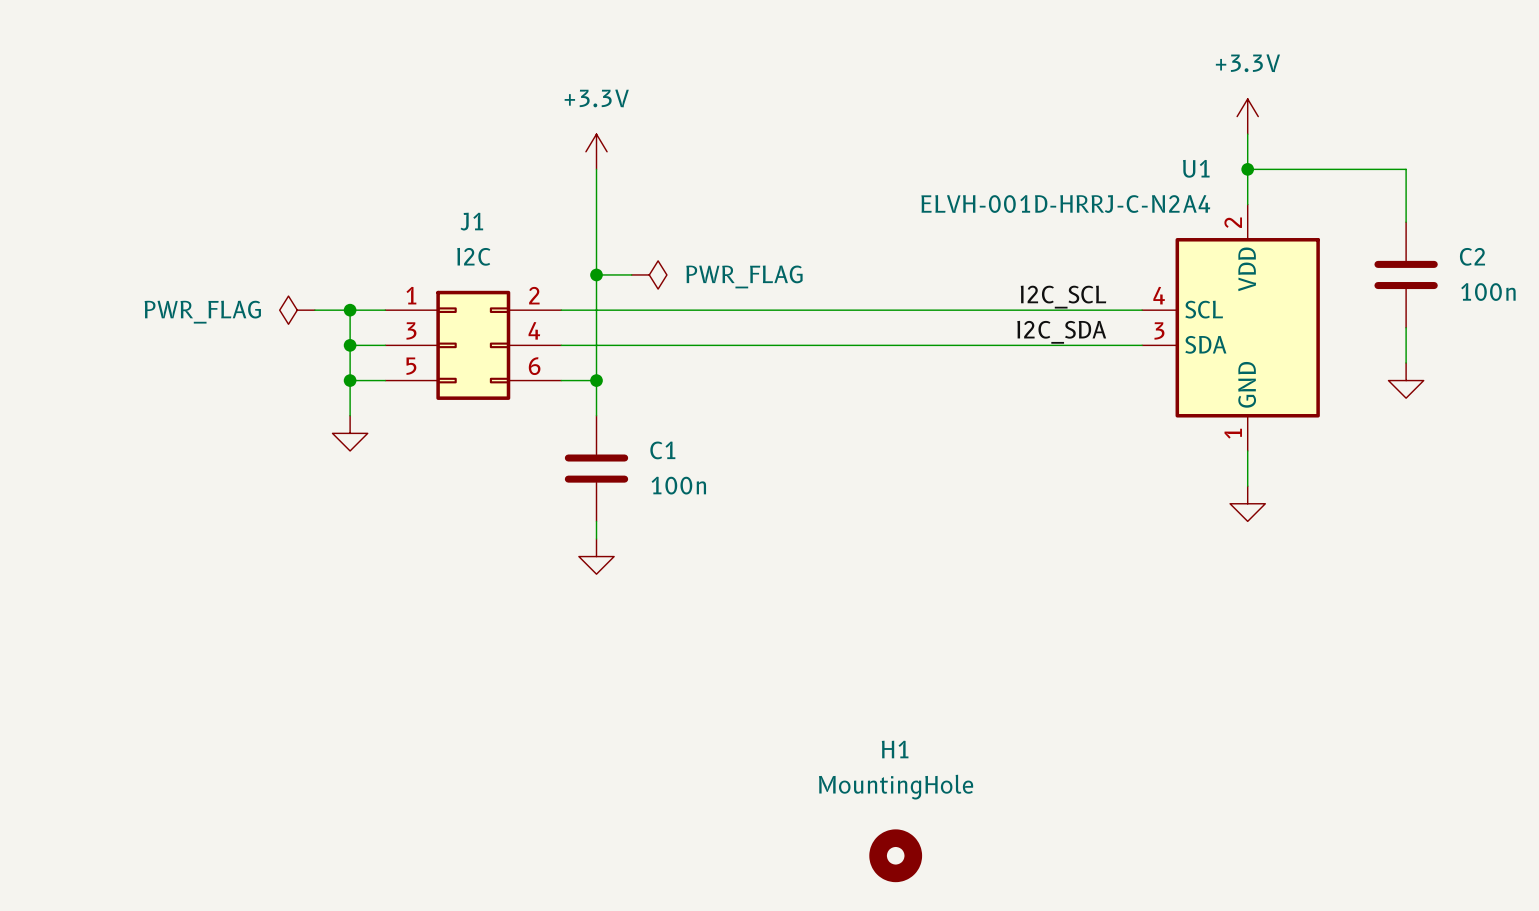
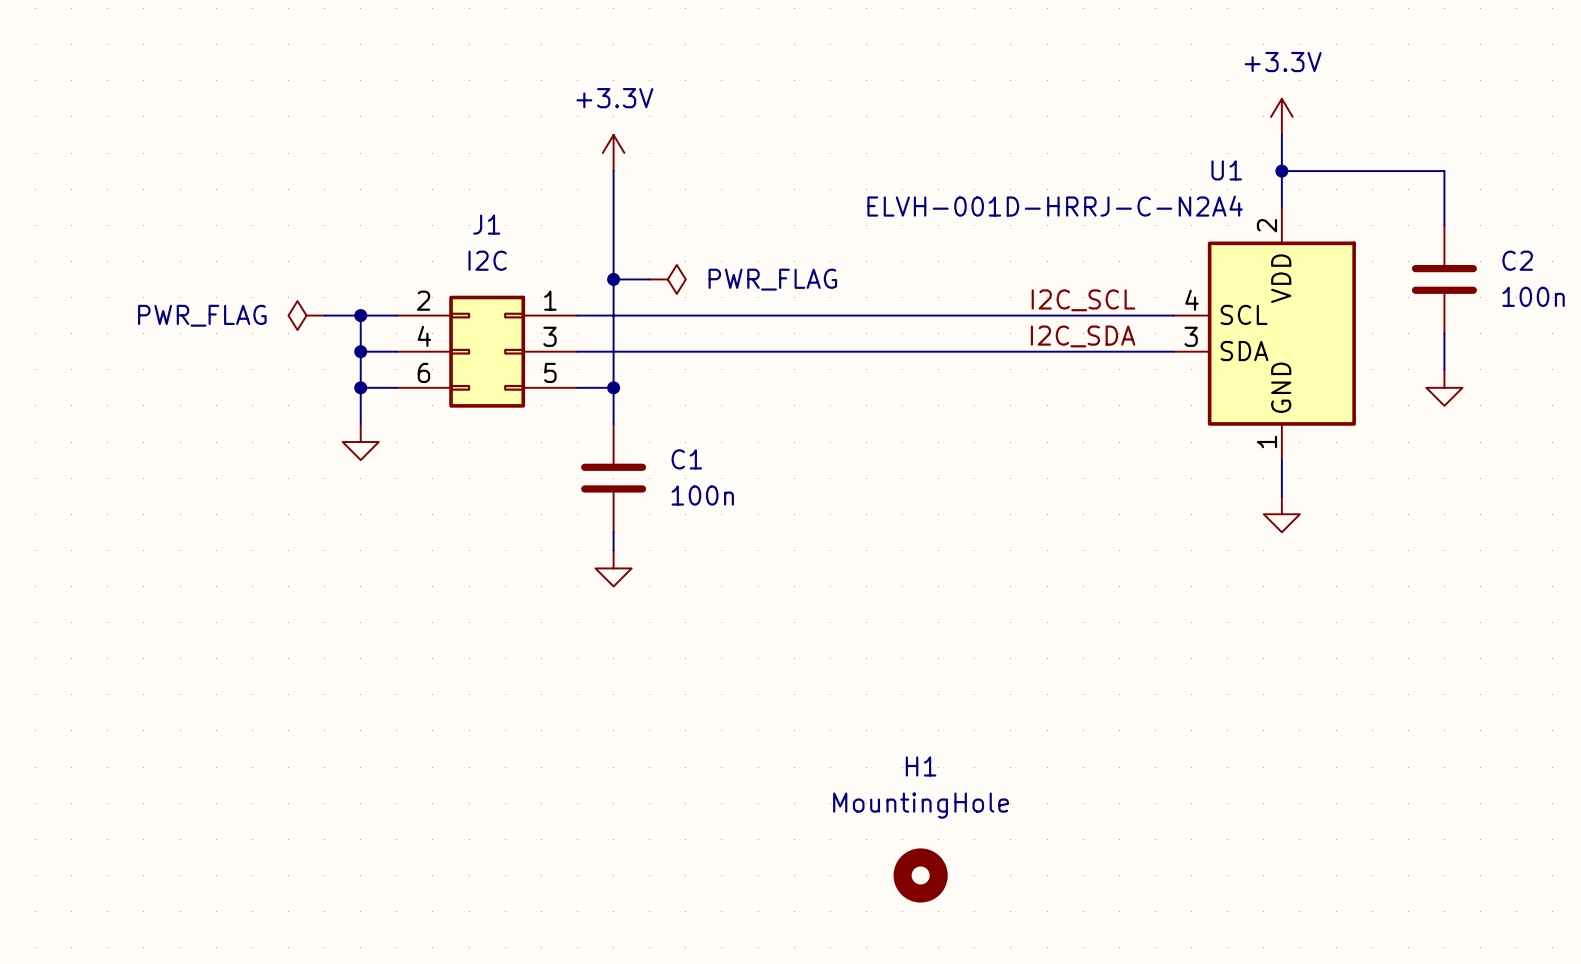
J1 flip: as is (473, 345) -> left-right (487, 351)

